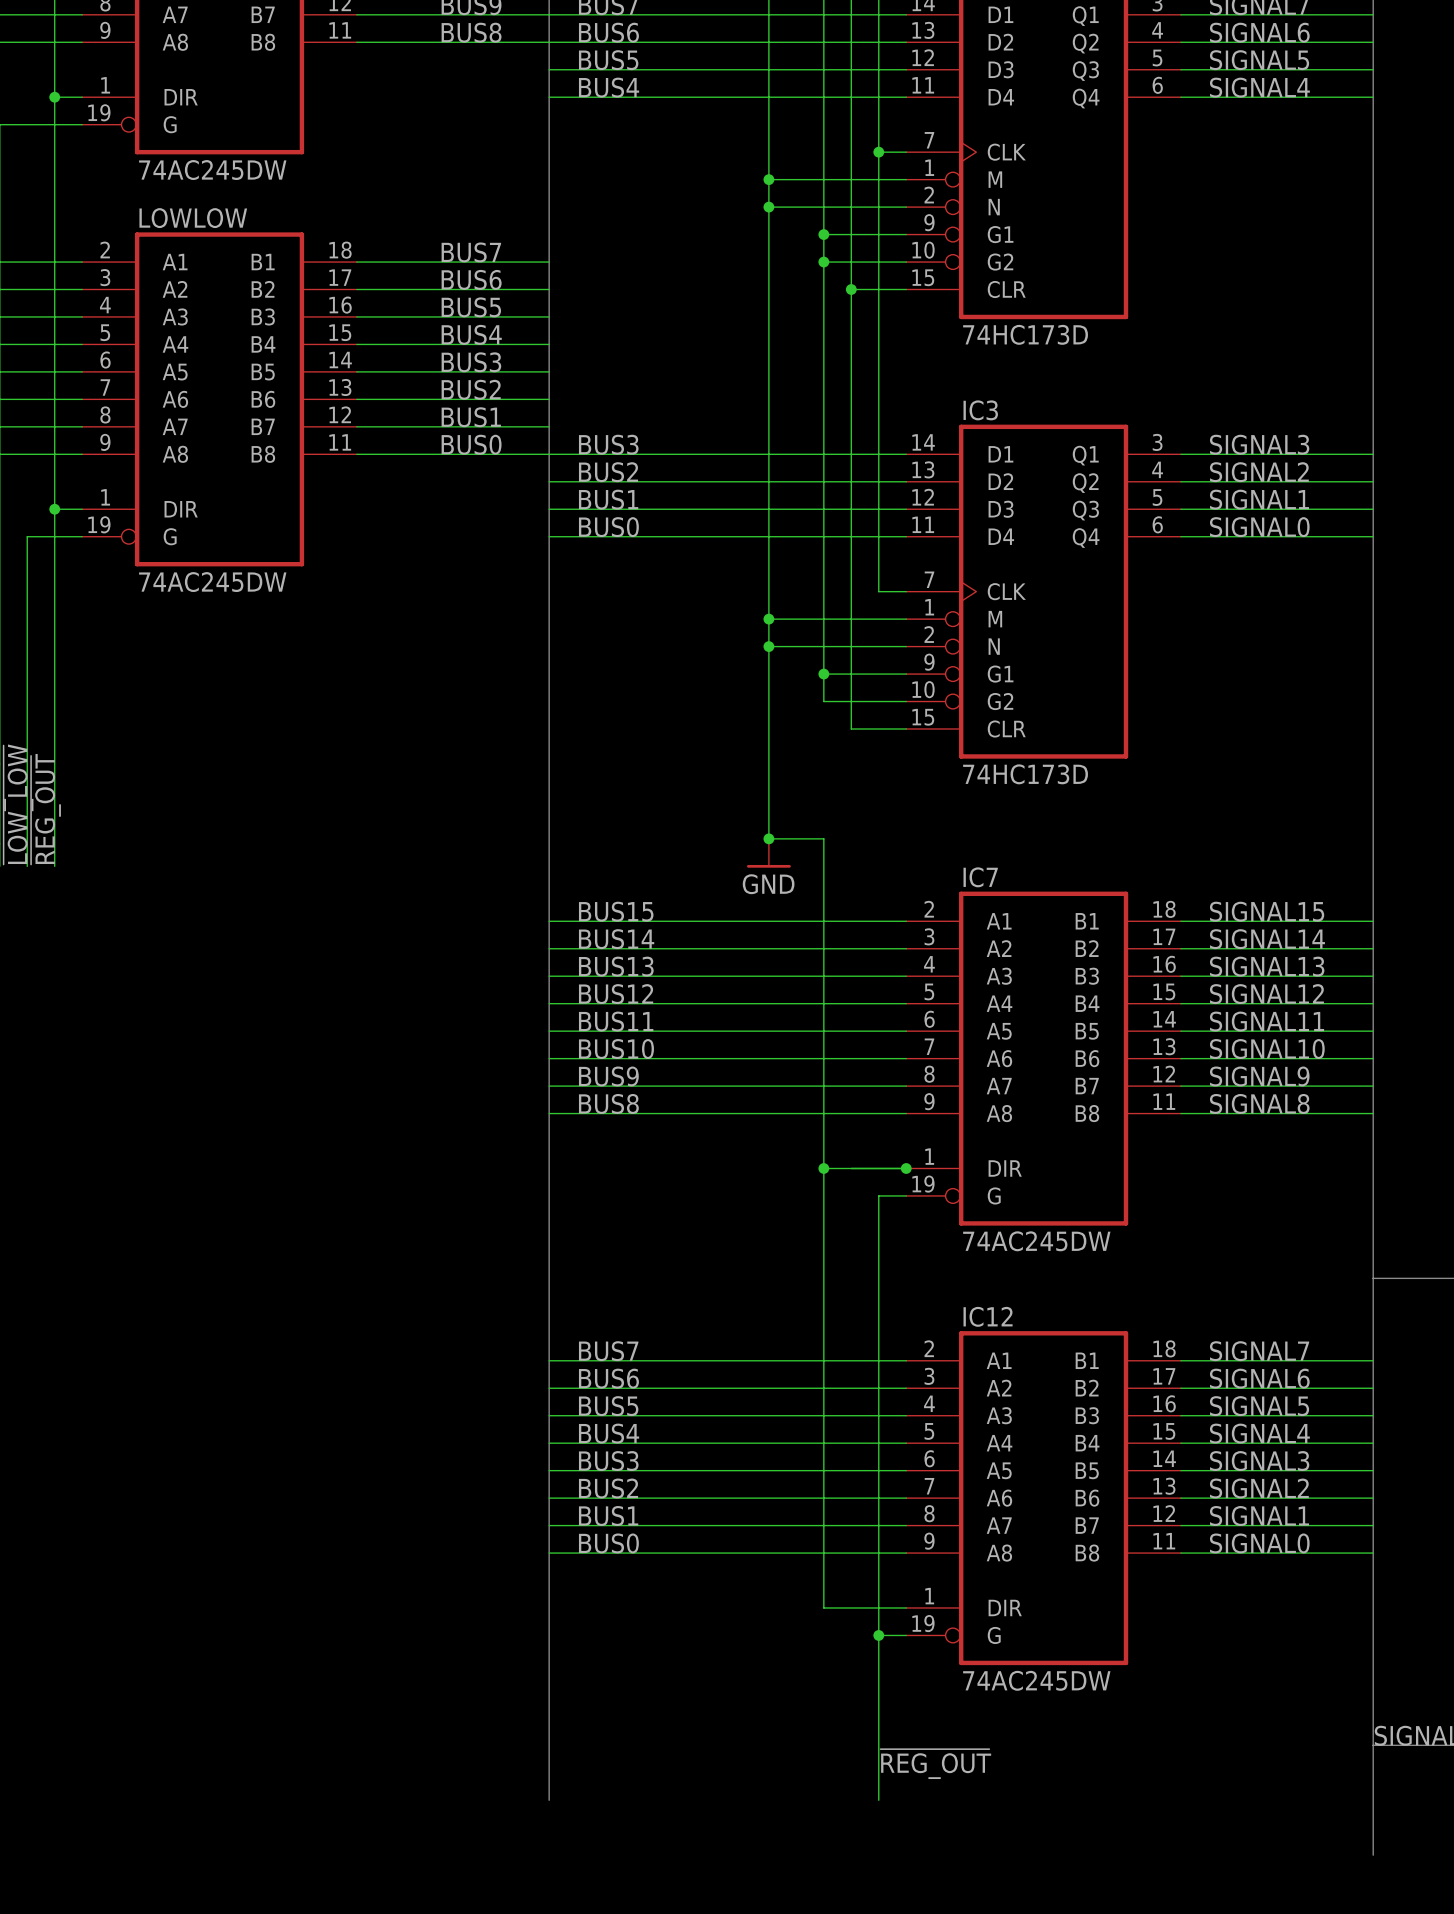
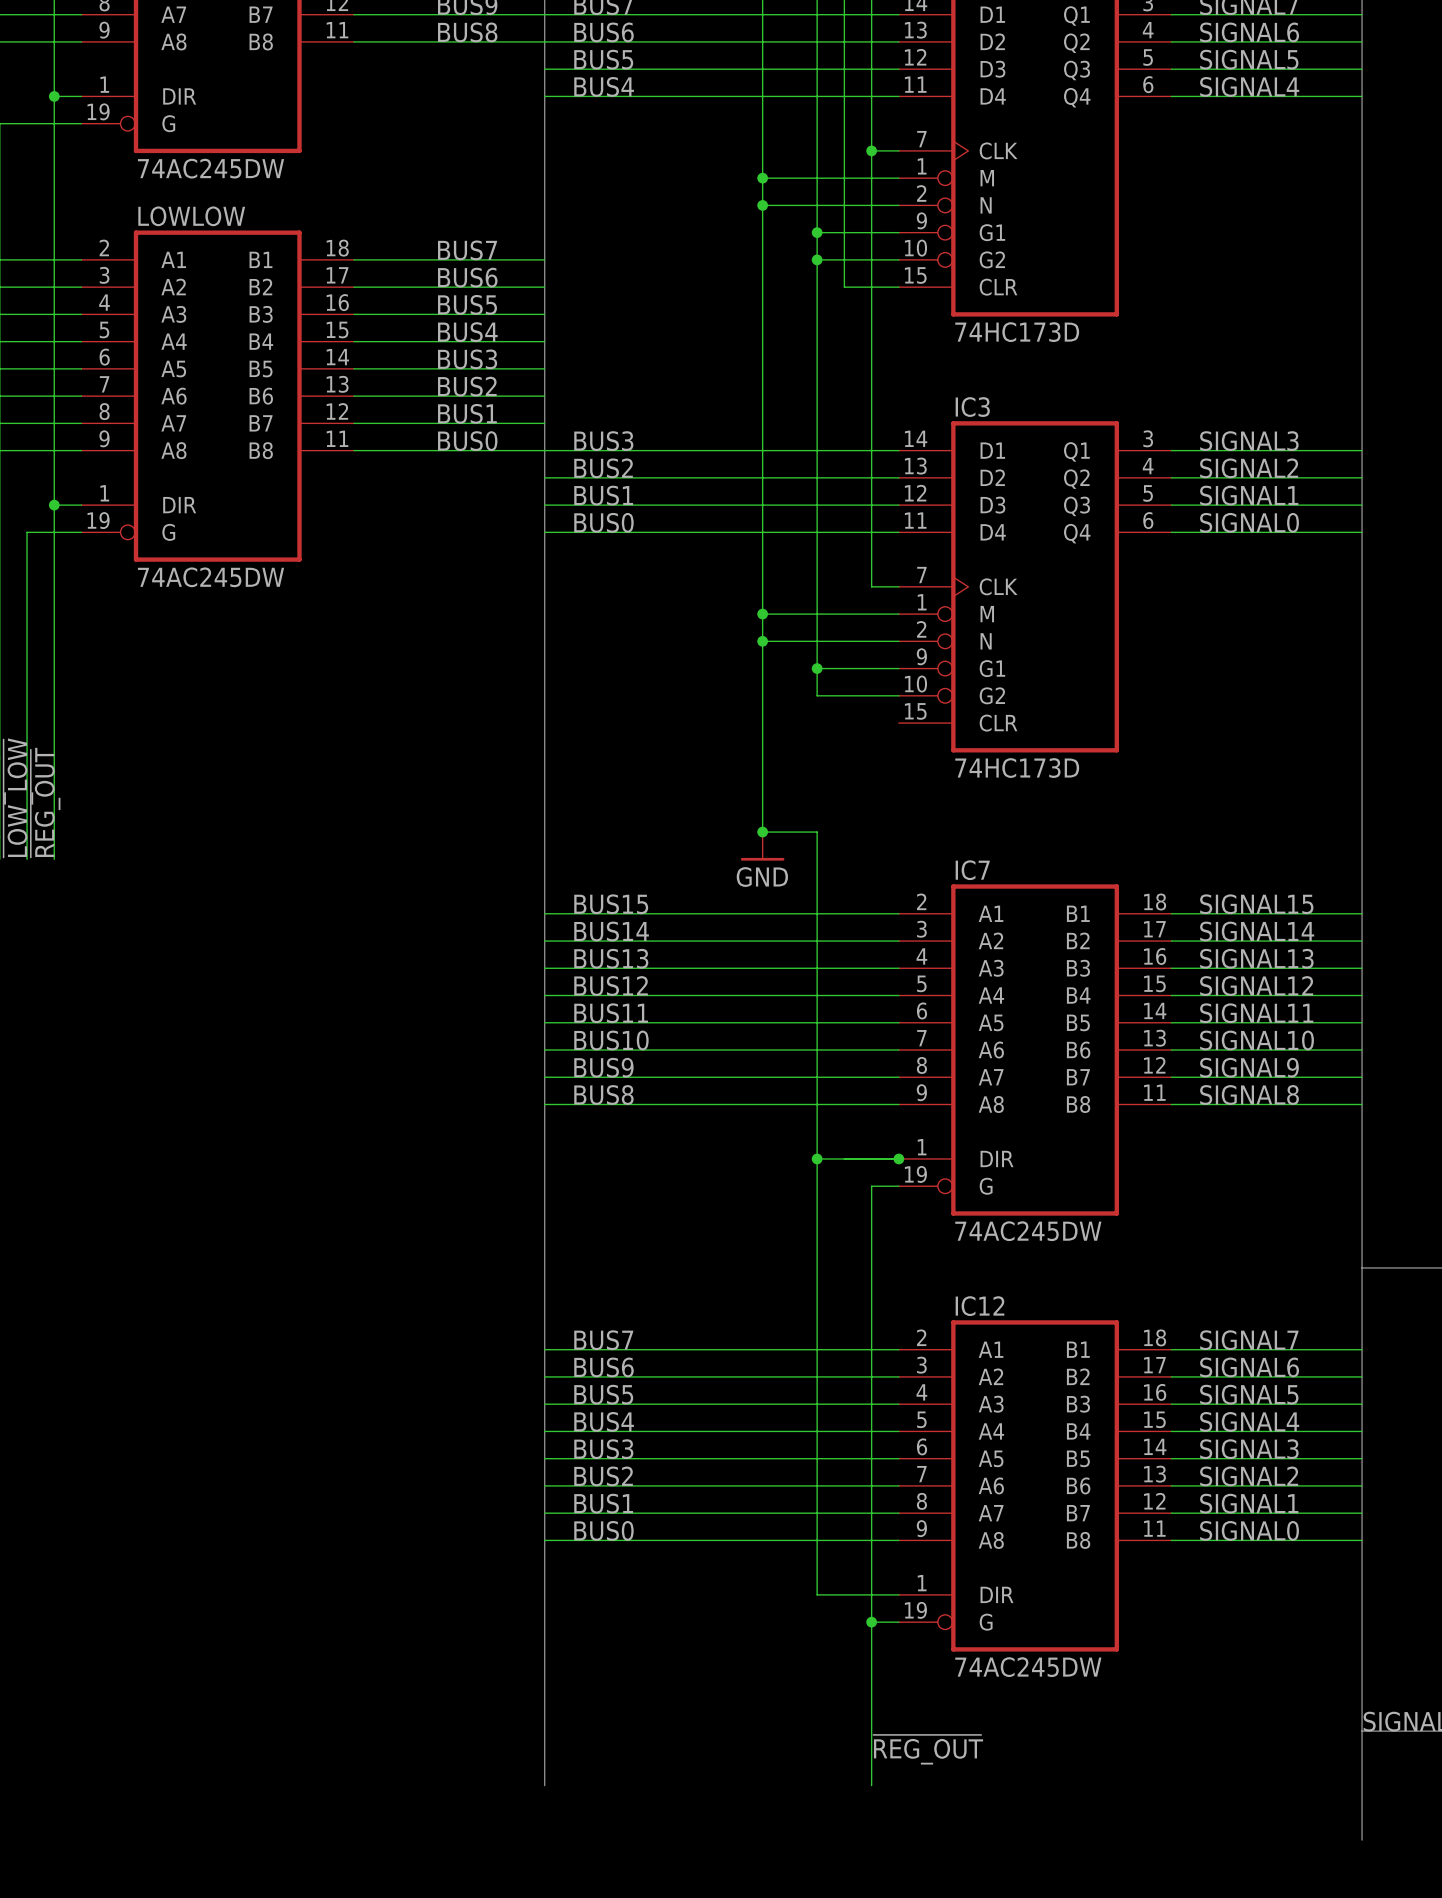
wire: (851, 289) (851, 729) (906, 729) -> none
junction: (851, 289) -> none

